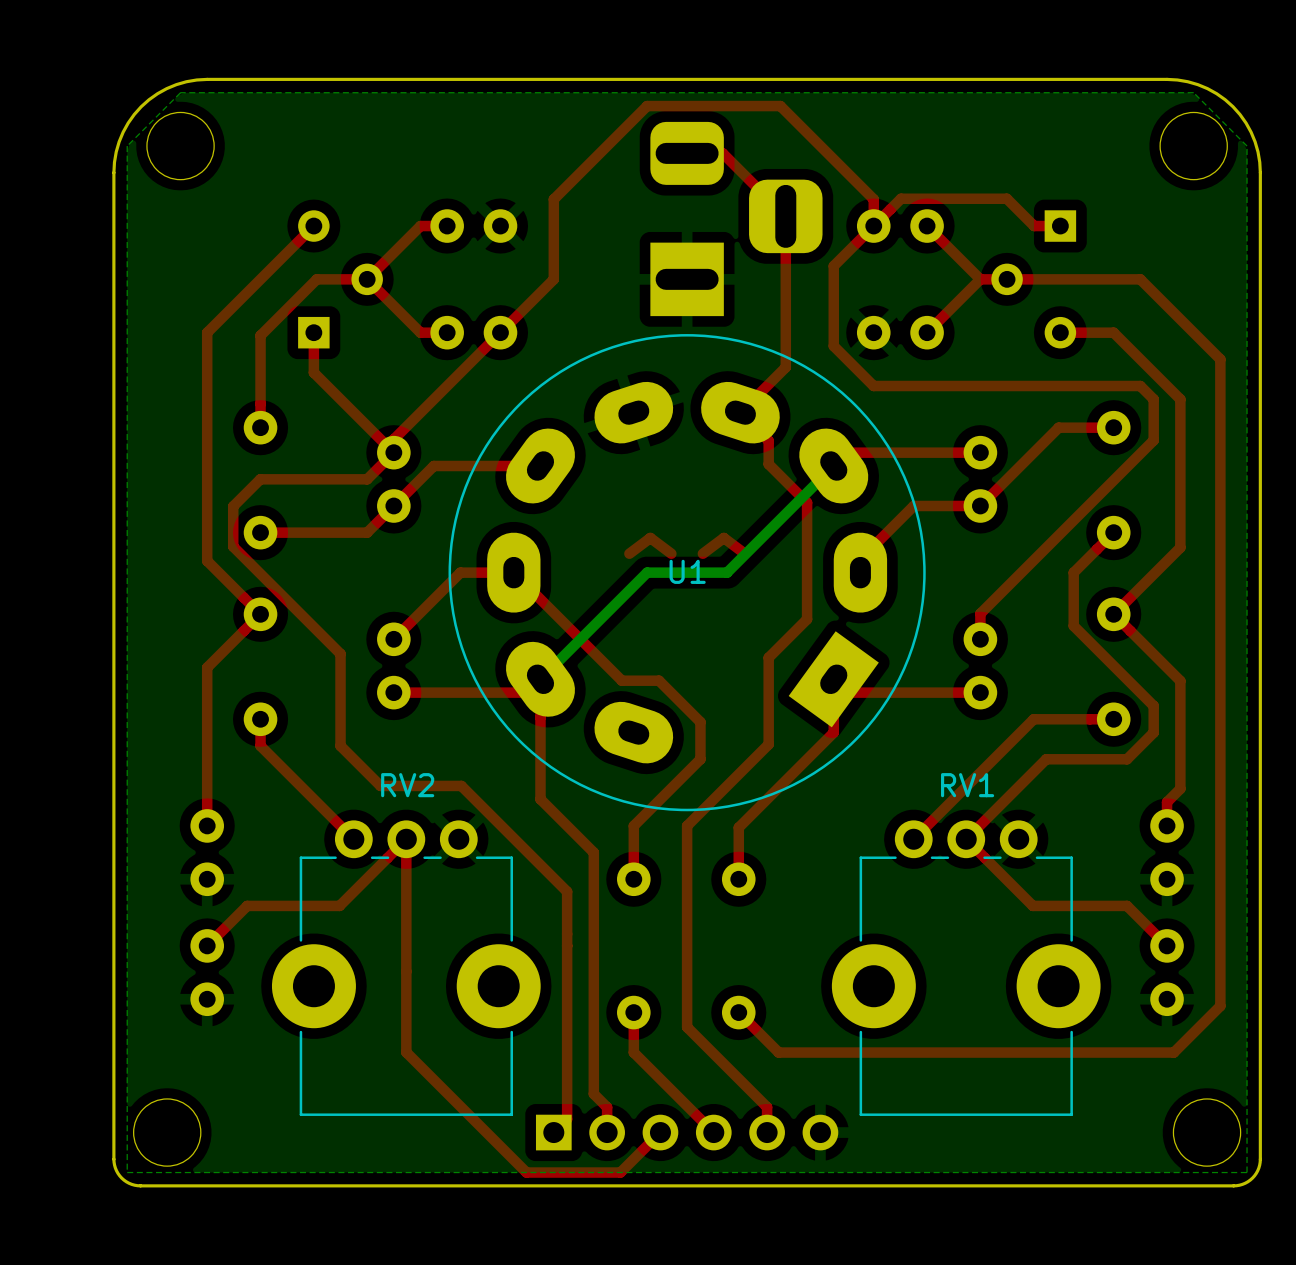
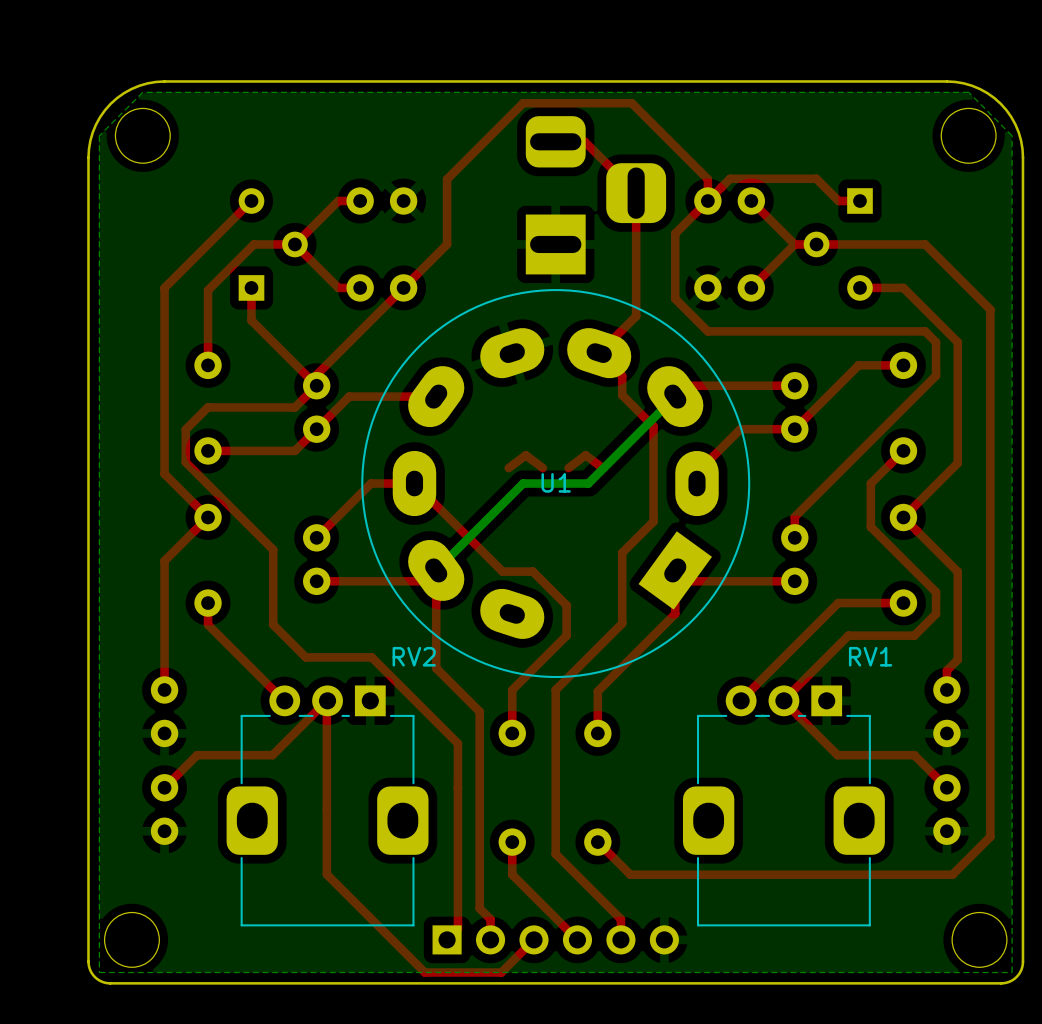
RV2 name position: RV2 (407, 785) -> RV2 (414, 656)
RV1 name position: RV1 (967, 785) -> RV1 (870, 656)
RV2 footprint: [271, 820, 541, 1116] -> [226, 685, 429, 927]
RV1 footprint: [831, 820, 1101, 1116] -> [682, 685, 885, 927]

